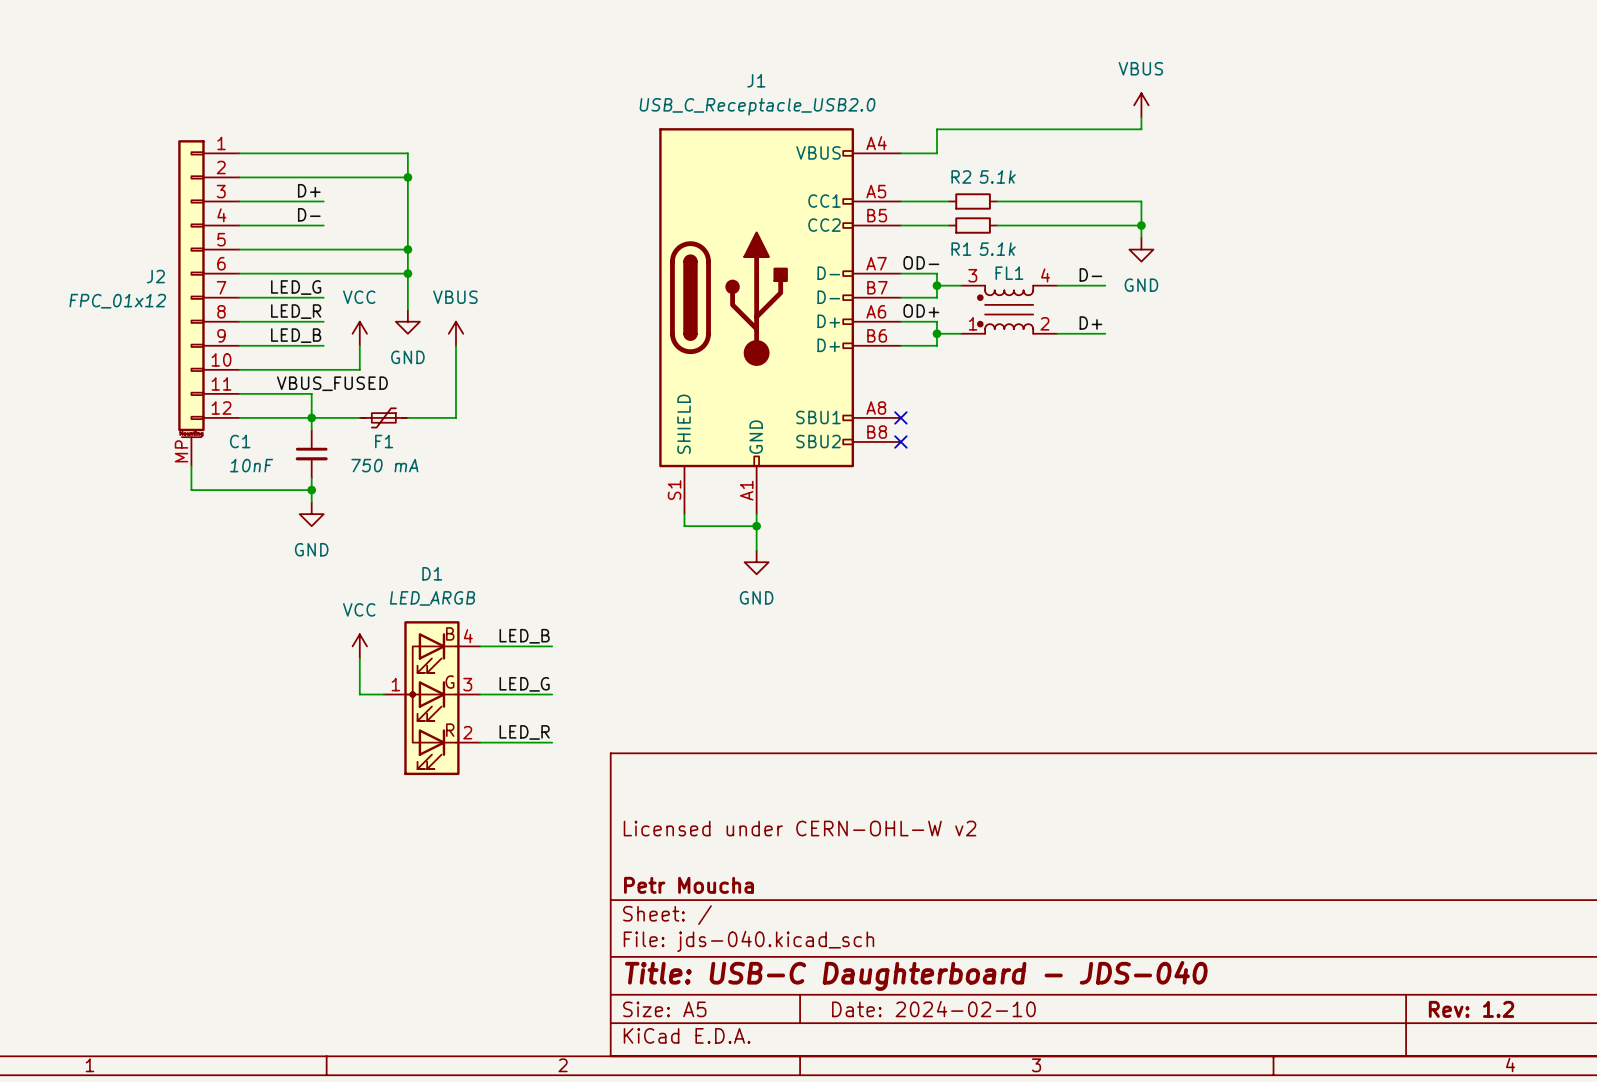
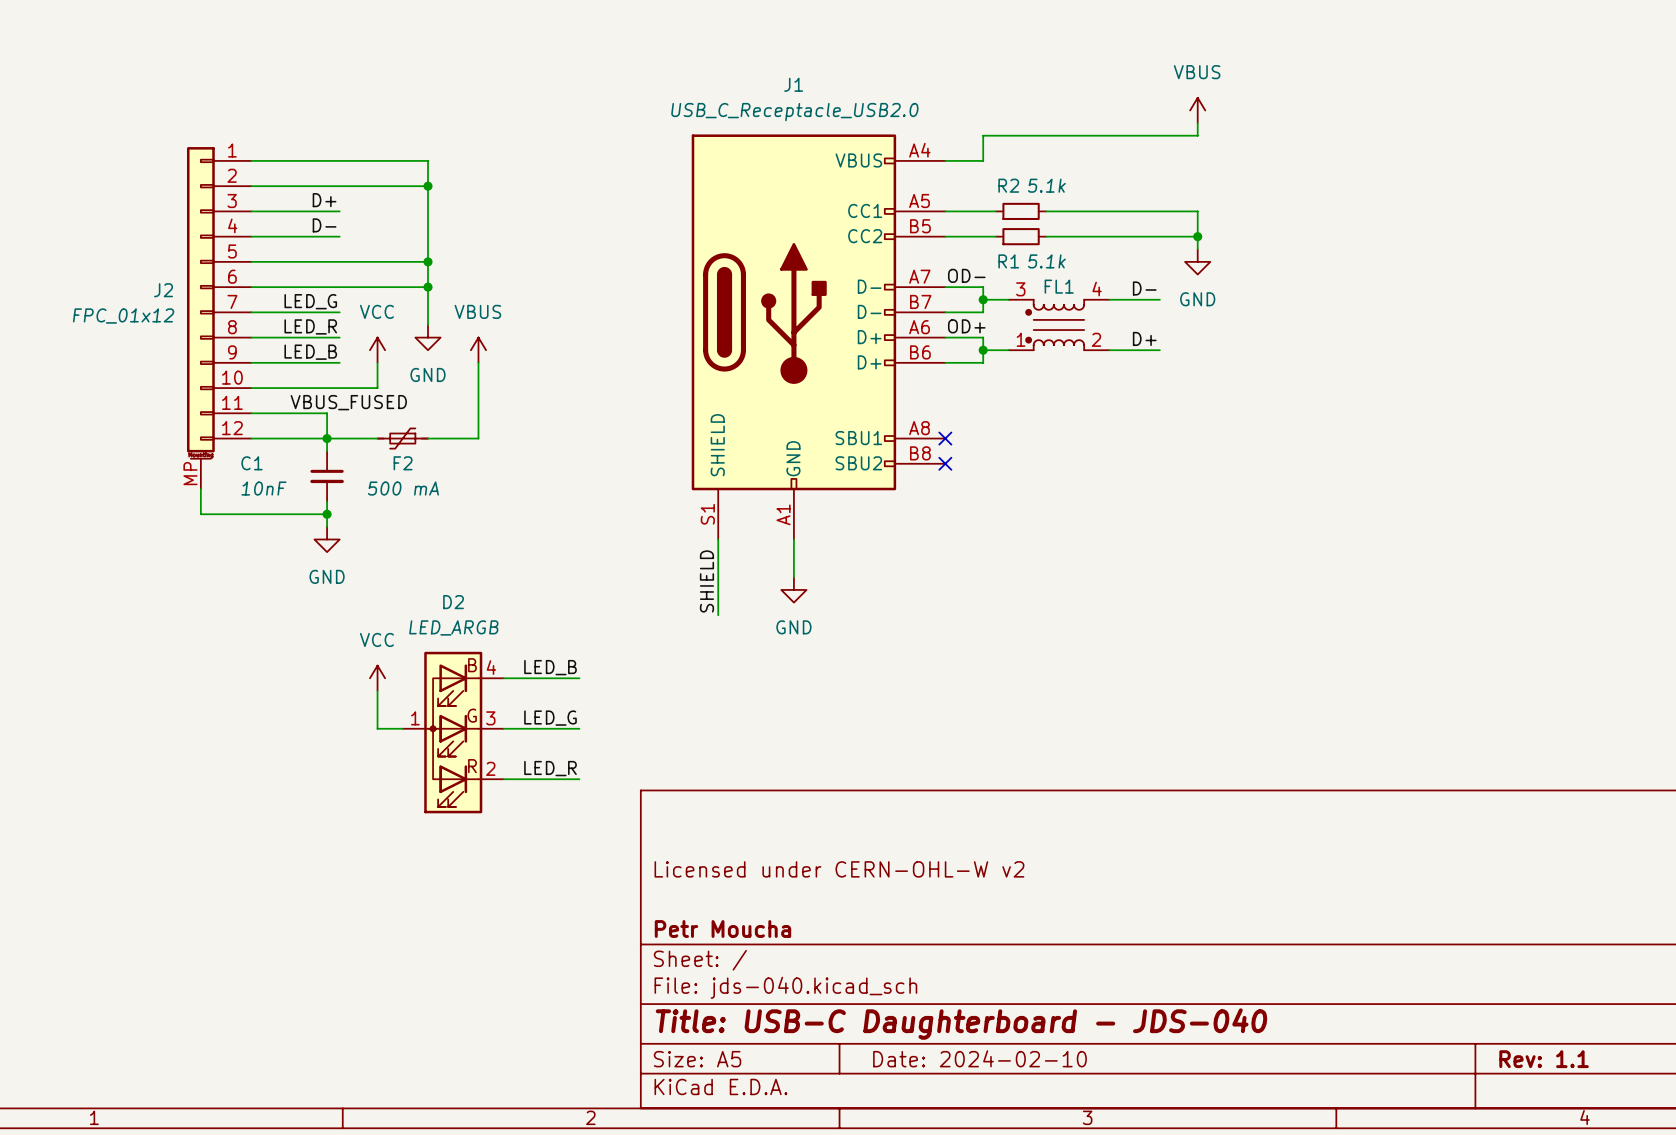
F1 name: F1 (384, 441) -> F2 (403, 463)
F1 value: 750 mA (384, 465) -> 500 mA (403, 488)
wire: (684, 526) (756, 526) -> (718, 552) (718, 615)
junction: (756, 526) -> none
label: none -> SHIELD (706, 581)
D1 name: D1 (432, 573) -> D2 (453, 602)
title block: Rev: 1.2 (1471, 1009) -> Rev: 1.1 (1544, 1059)

